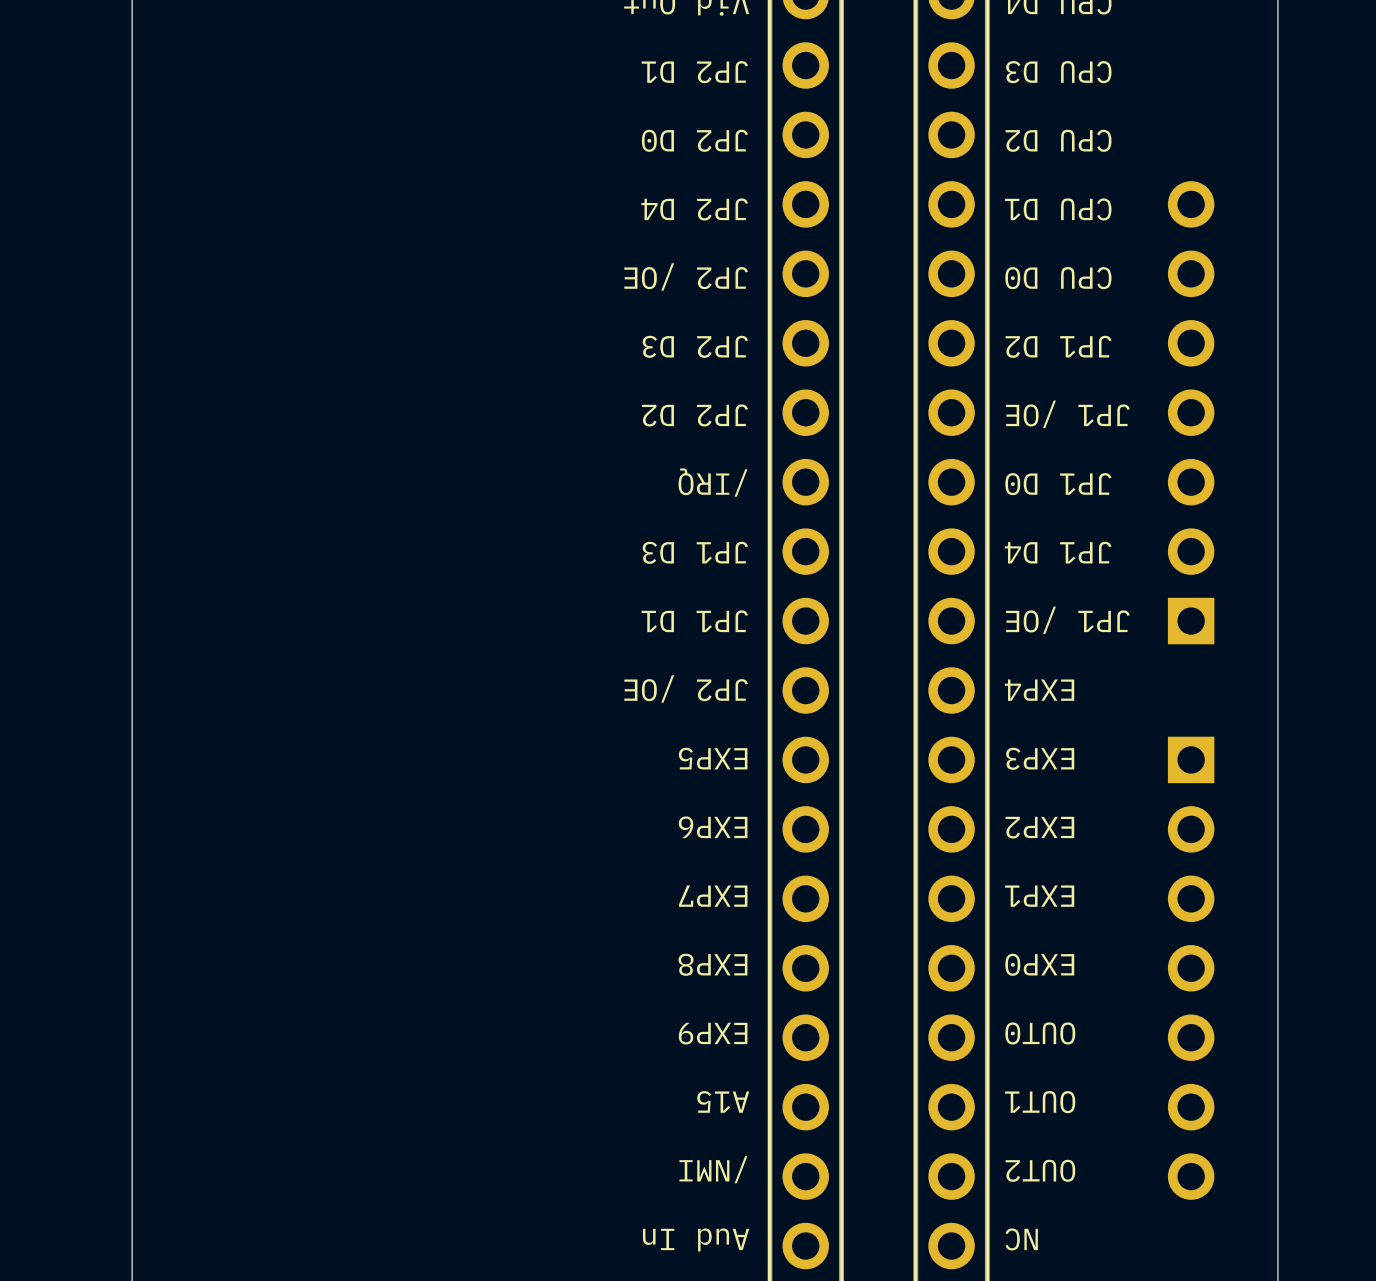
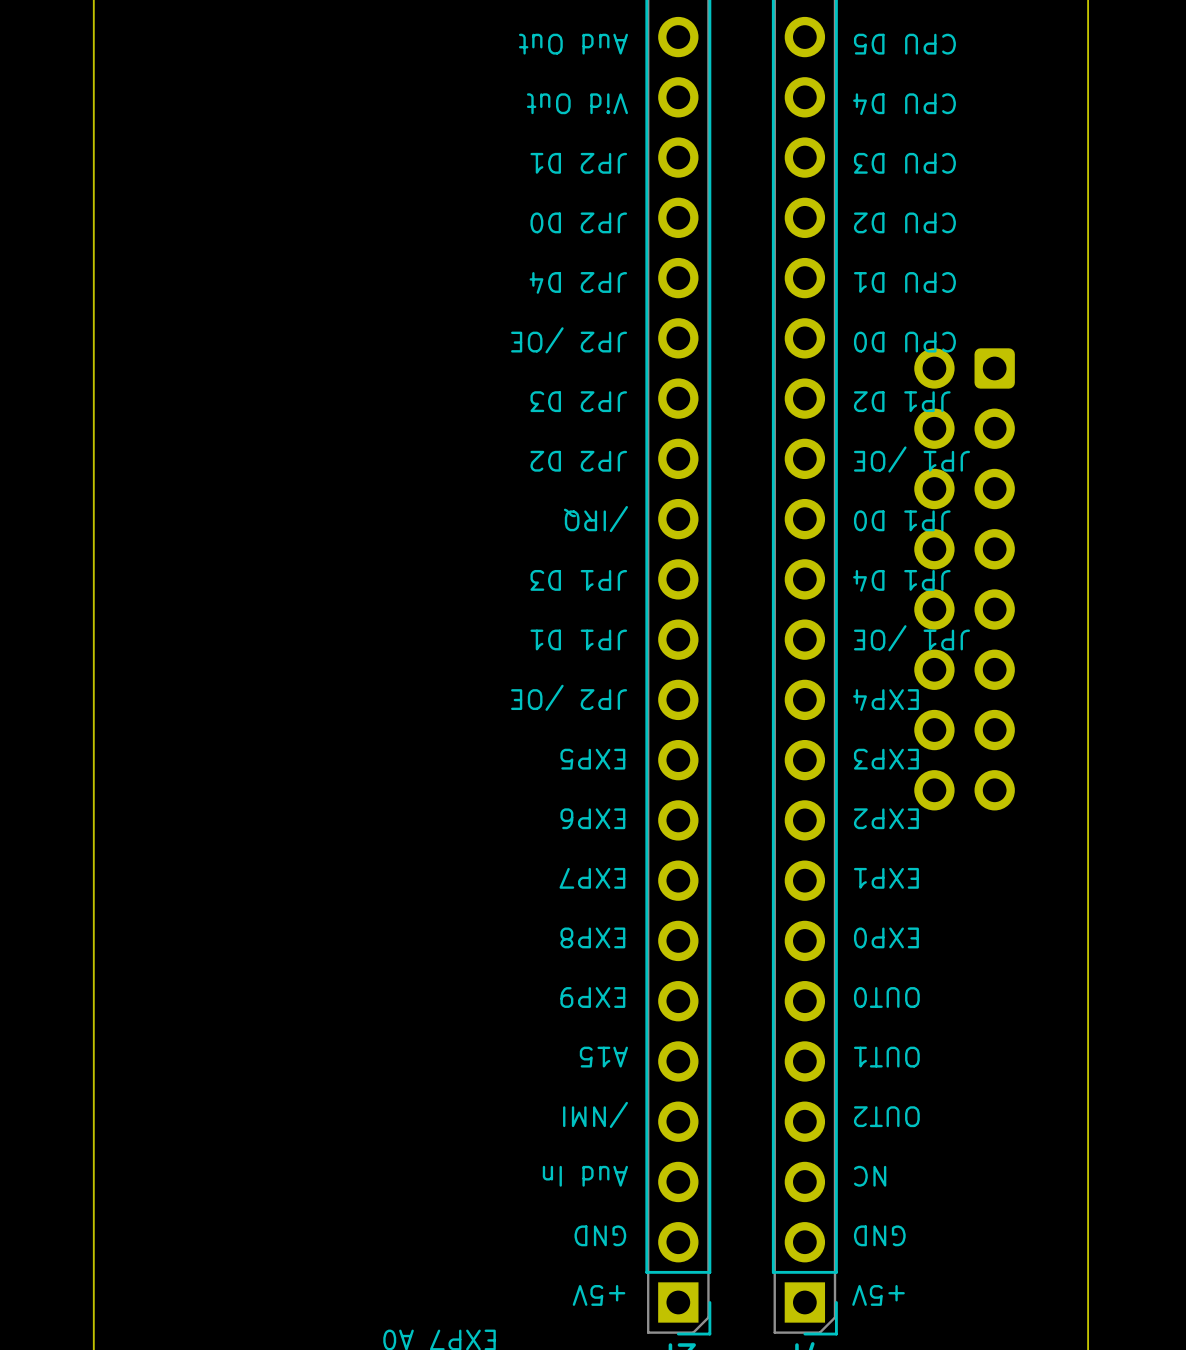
part: (1191, 412) -> none
part: none -> (964, 579)
part: (1191, 968) -> none

